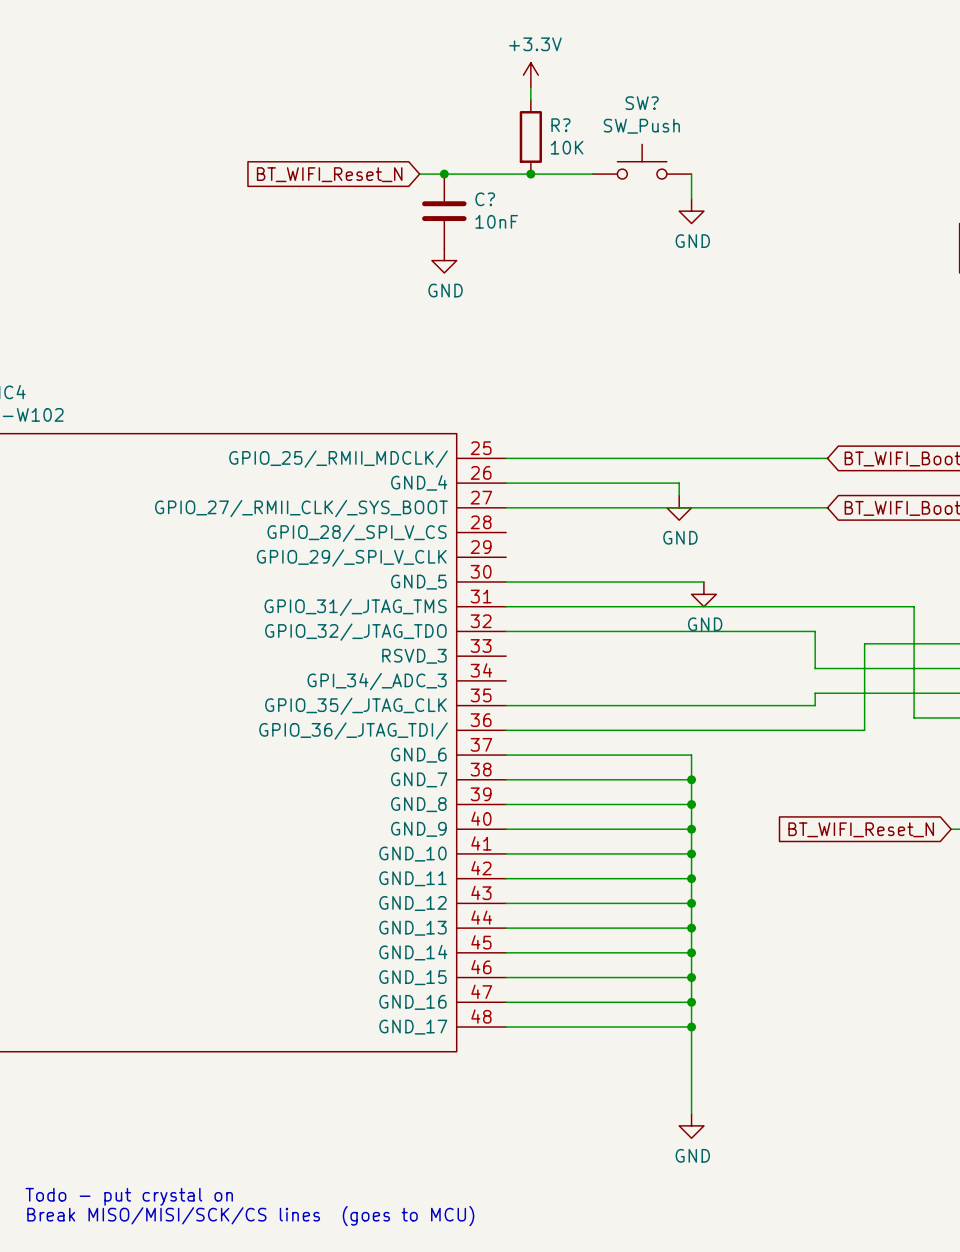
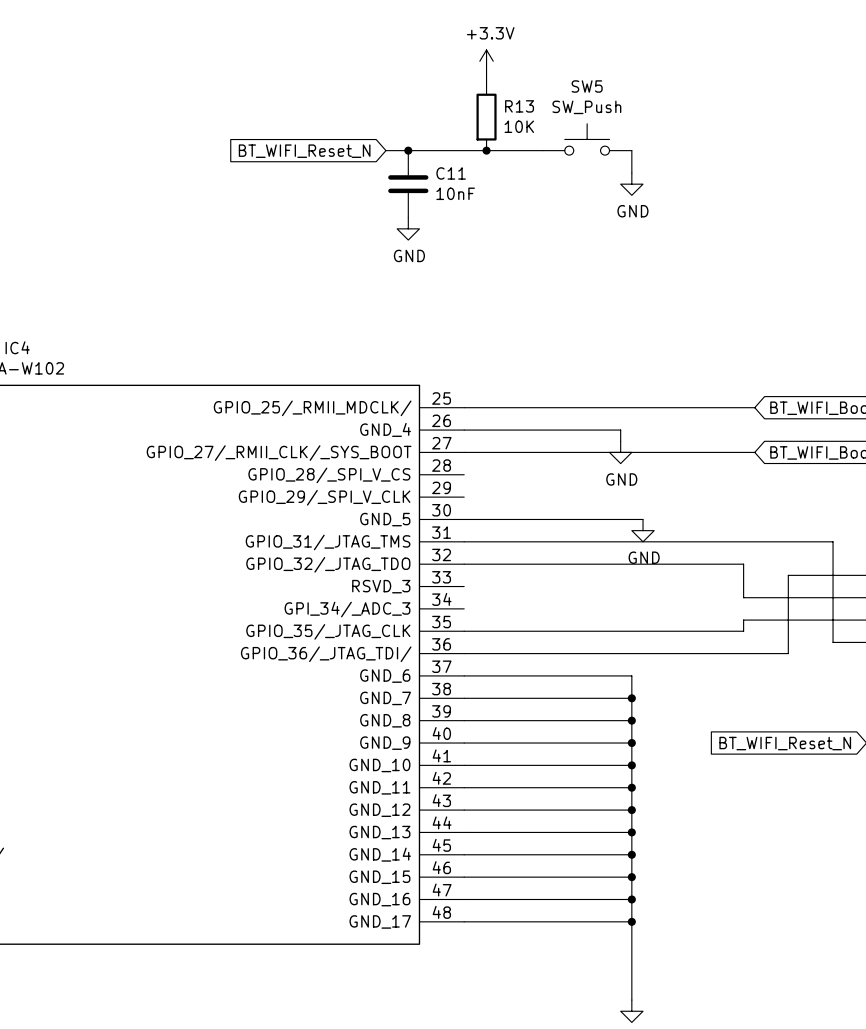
SW? name: SW? (642, 103) -> SW5 (587, 86)
R? name: R? (560, 125) -> R13 (519, 106)
C? name: C? (485, 199) -> C11 (451, 173)

